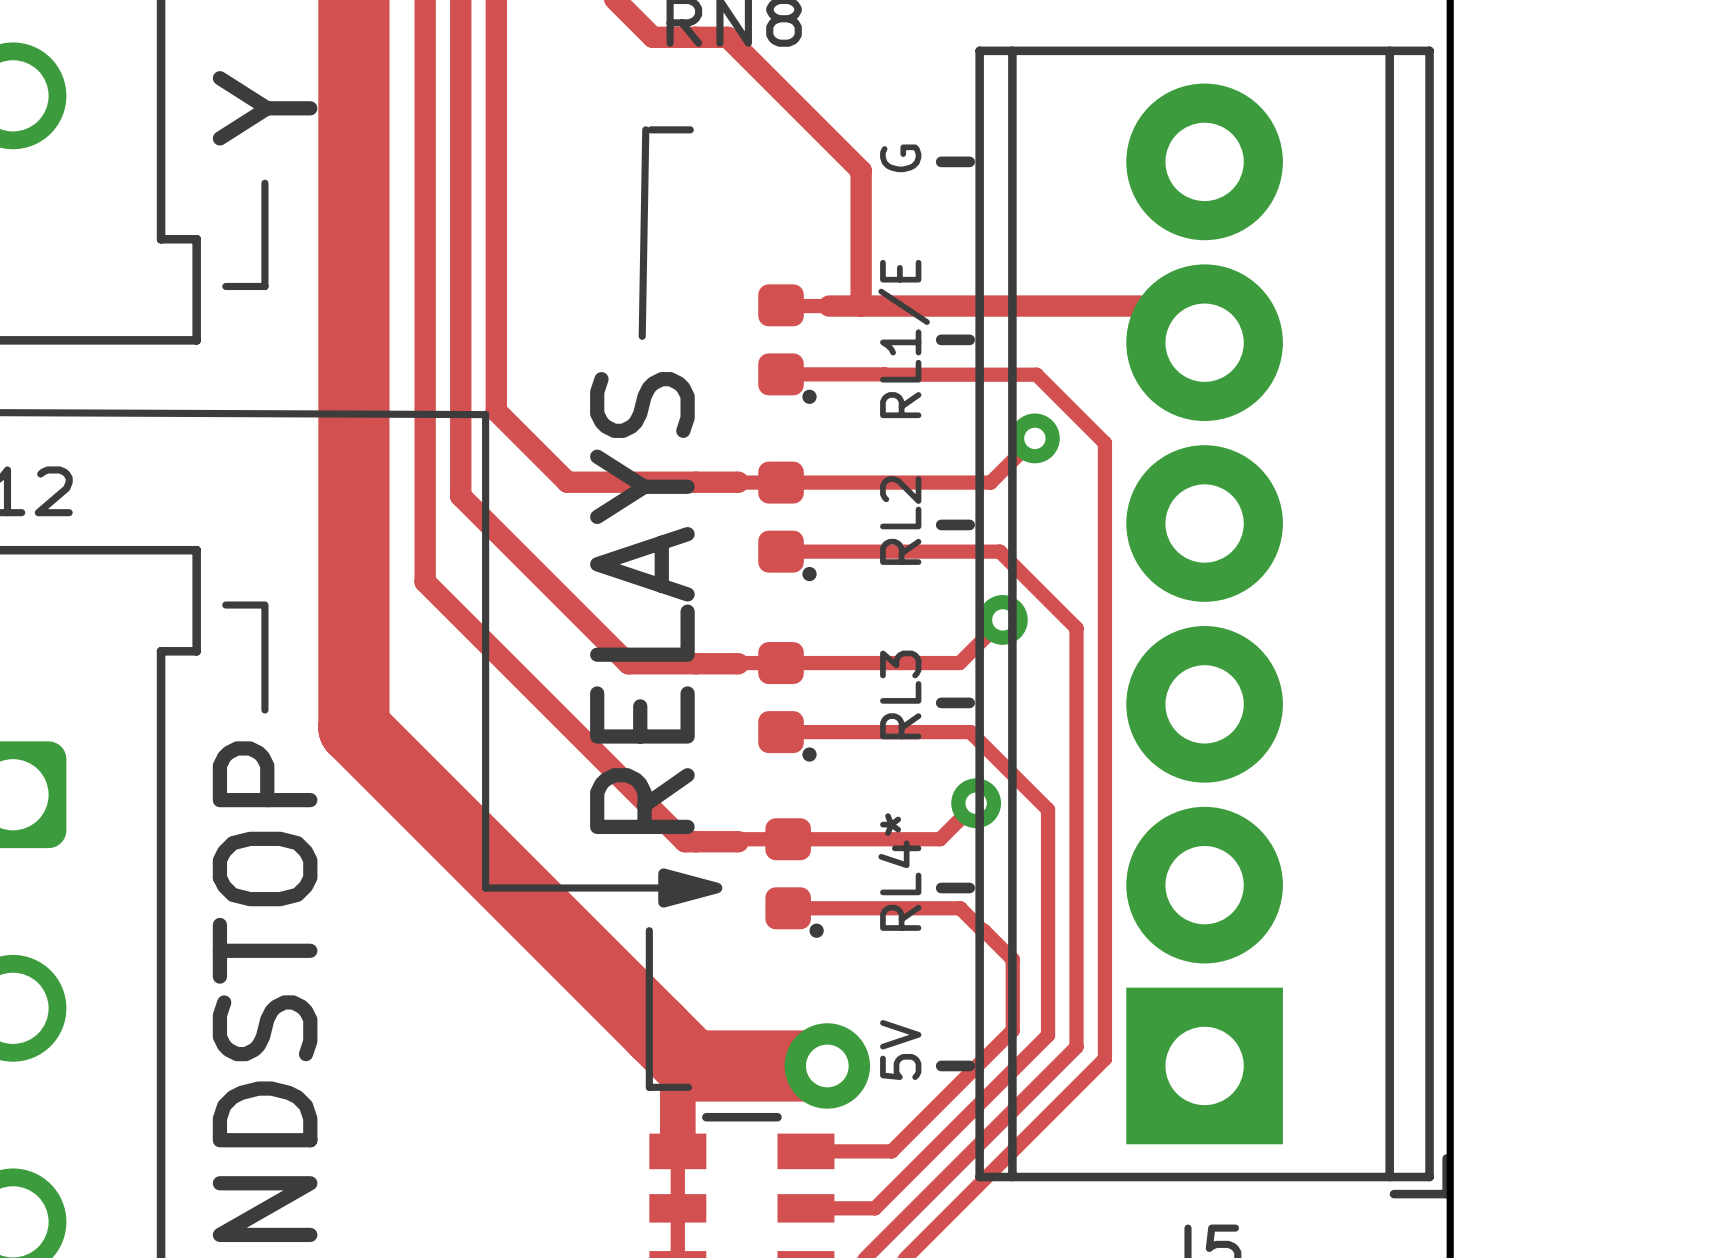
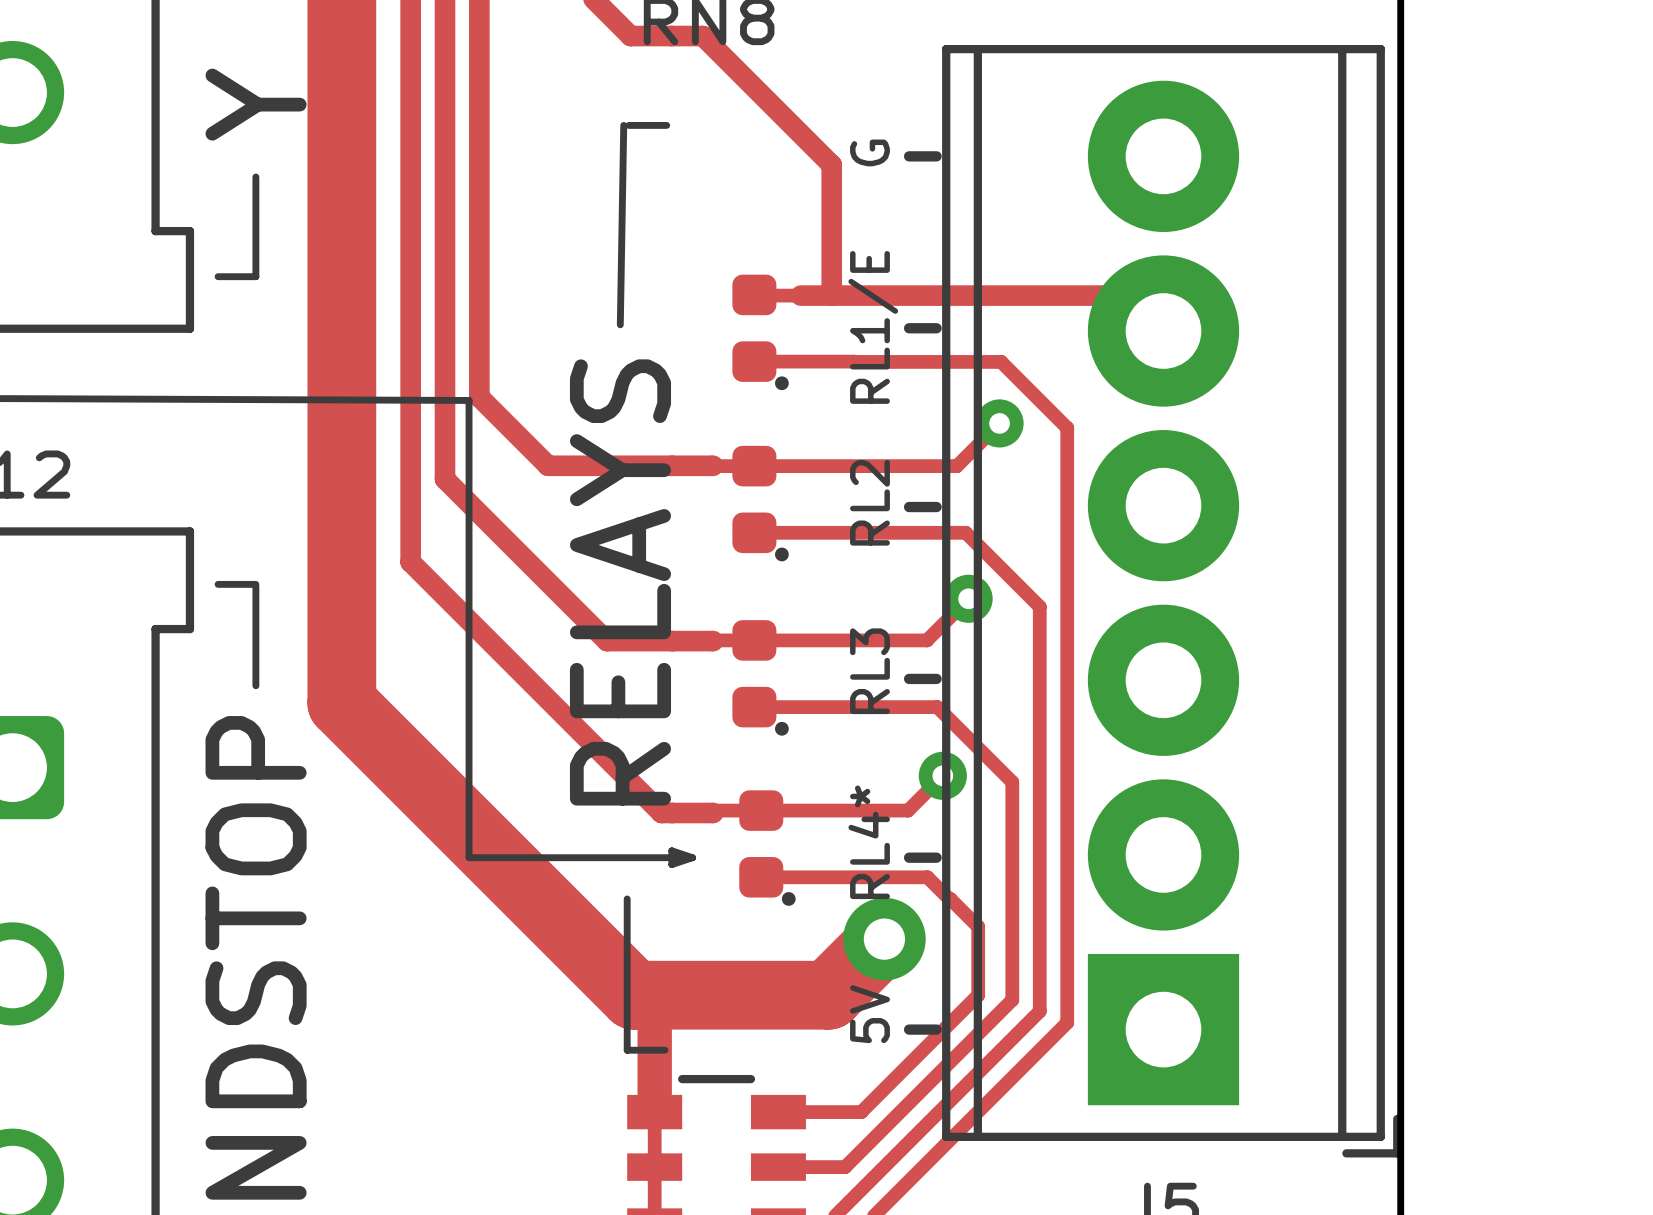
drawing: [658, 868, 723, 908] -> none
line: none -> (671, 850) (692, 857) (671, 864) (671, 850)
track: (656, 1030) (692, 1065) (827, 1065) -> (634, 995) (828, 995) (884, 939)
via position: (827, 1065) -> (884, 939)

